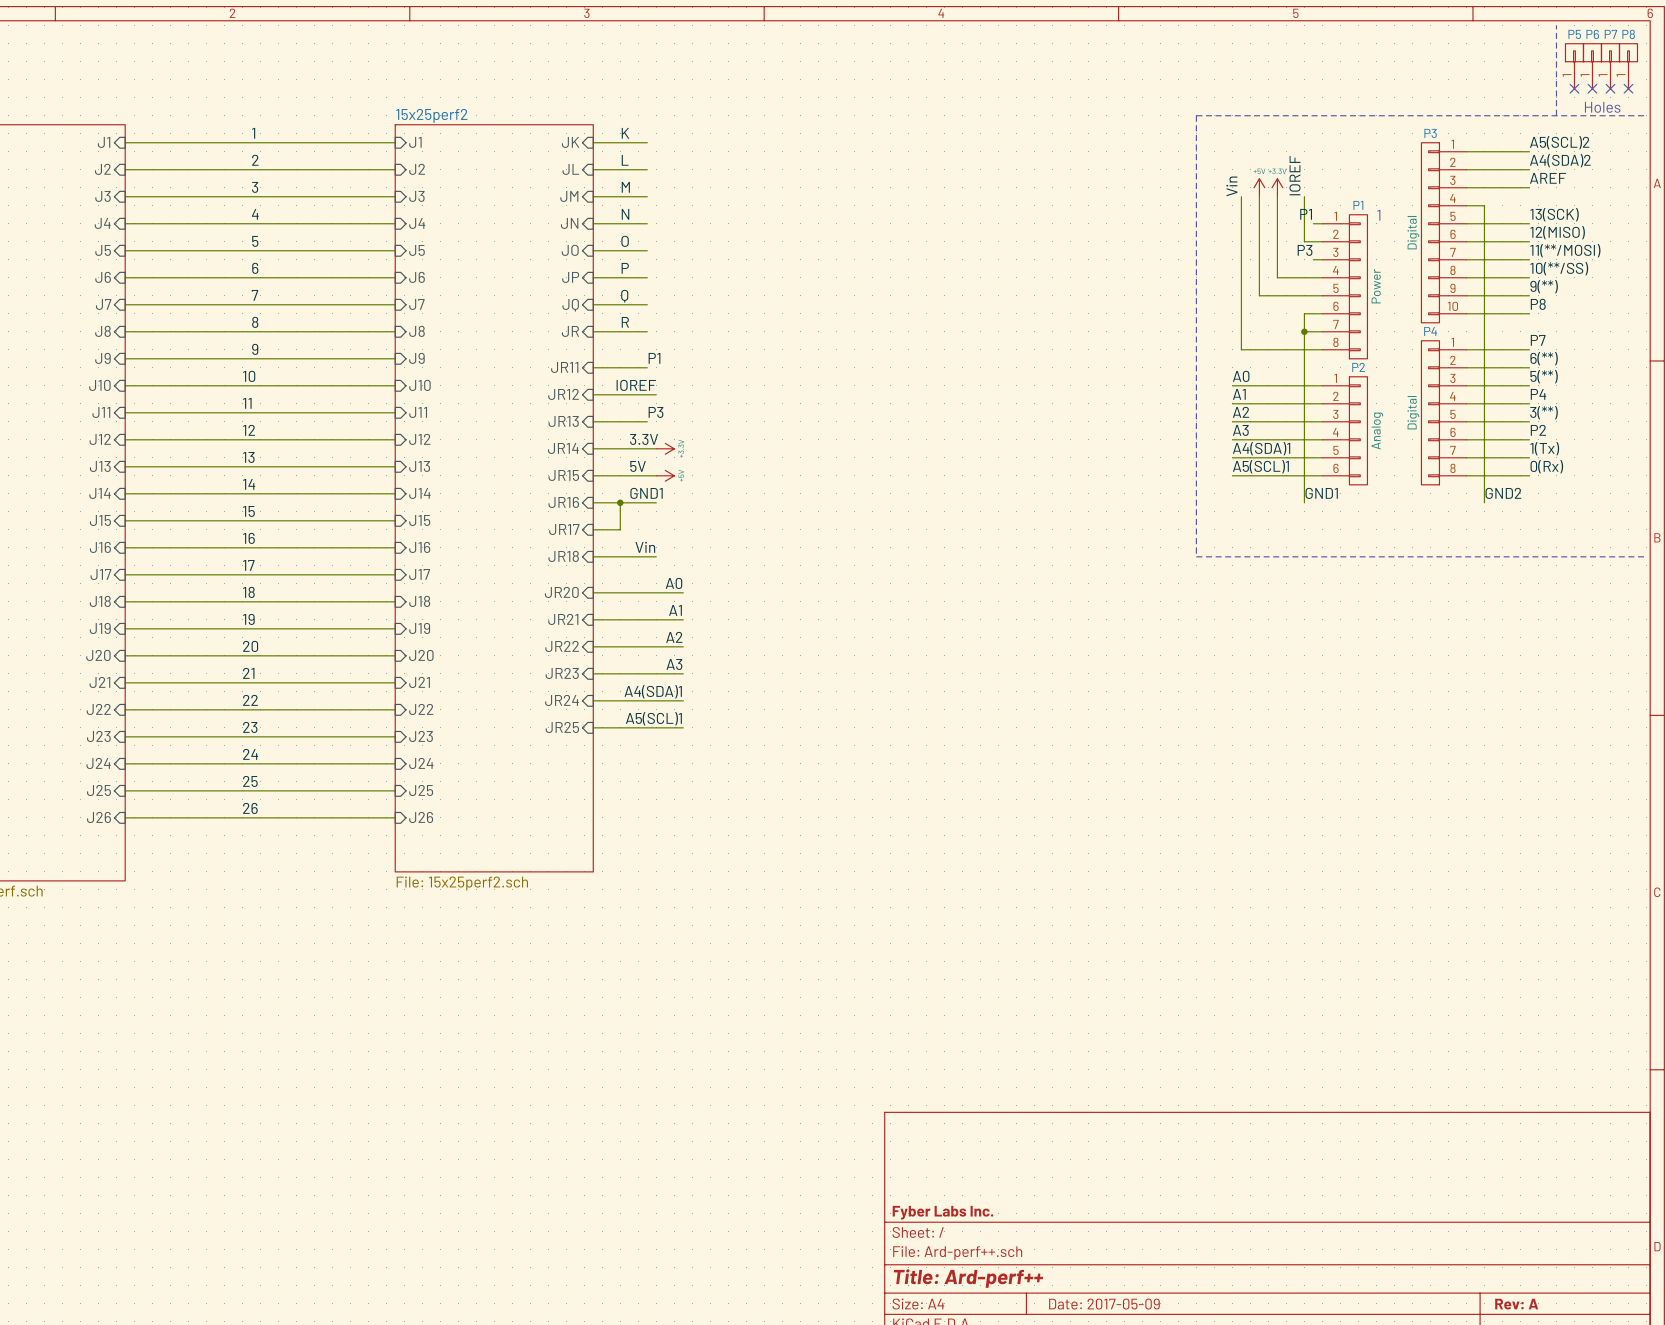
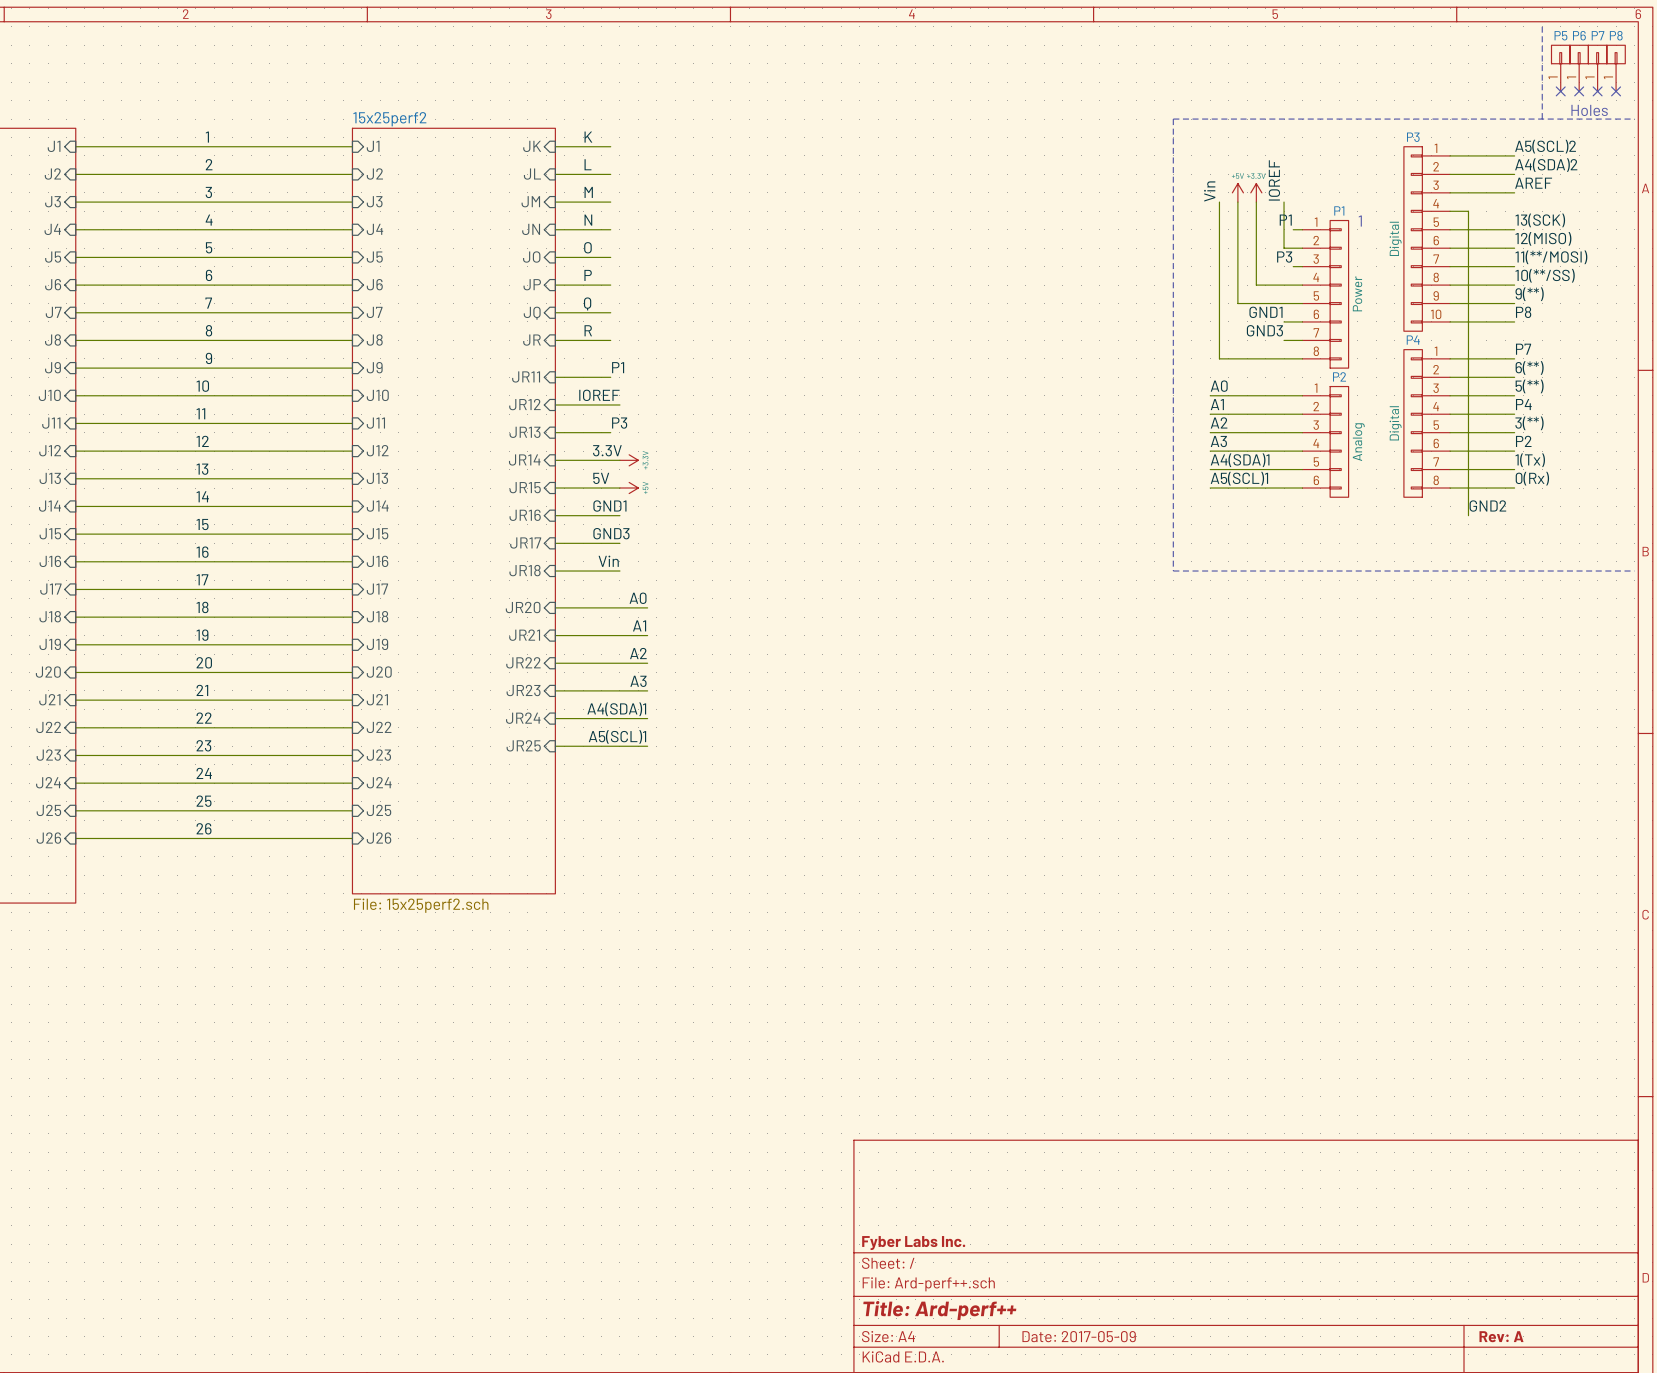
label: none -> GND1 (1266, 312)
wire: (1304, 313) (1304, 502) -> none
label: none -> GND3 (1264, 330)
junction: (1304, 331) -> none
label: GND1 (1321, 493) -> none
wire: (620, 502) (620, 529) -> (619, 543) (583, 543)
junction: (620, 502) -> none
label: none -> GND3 (611, 533)

